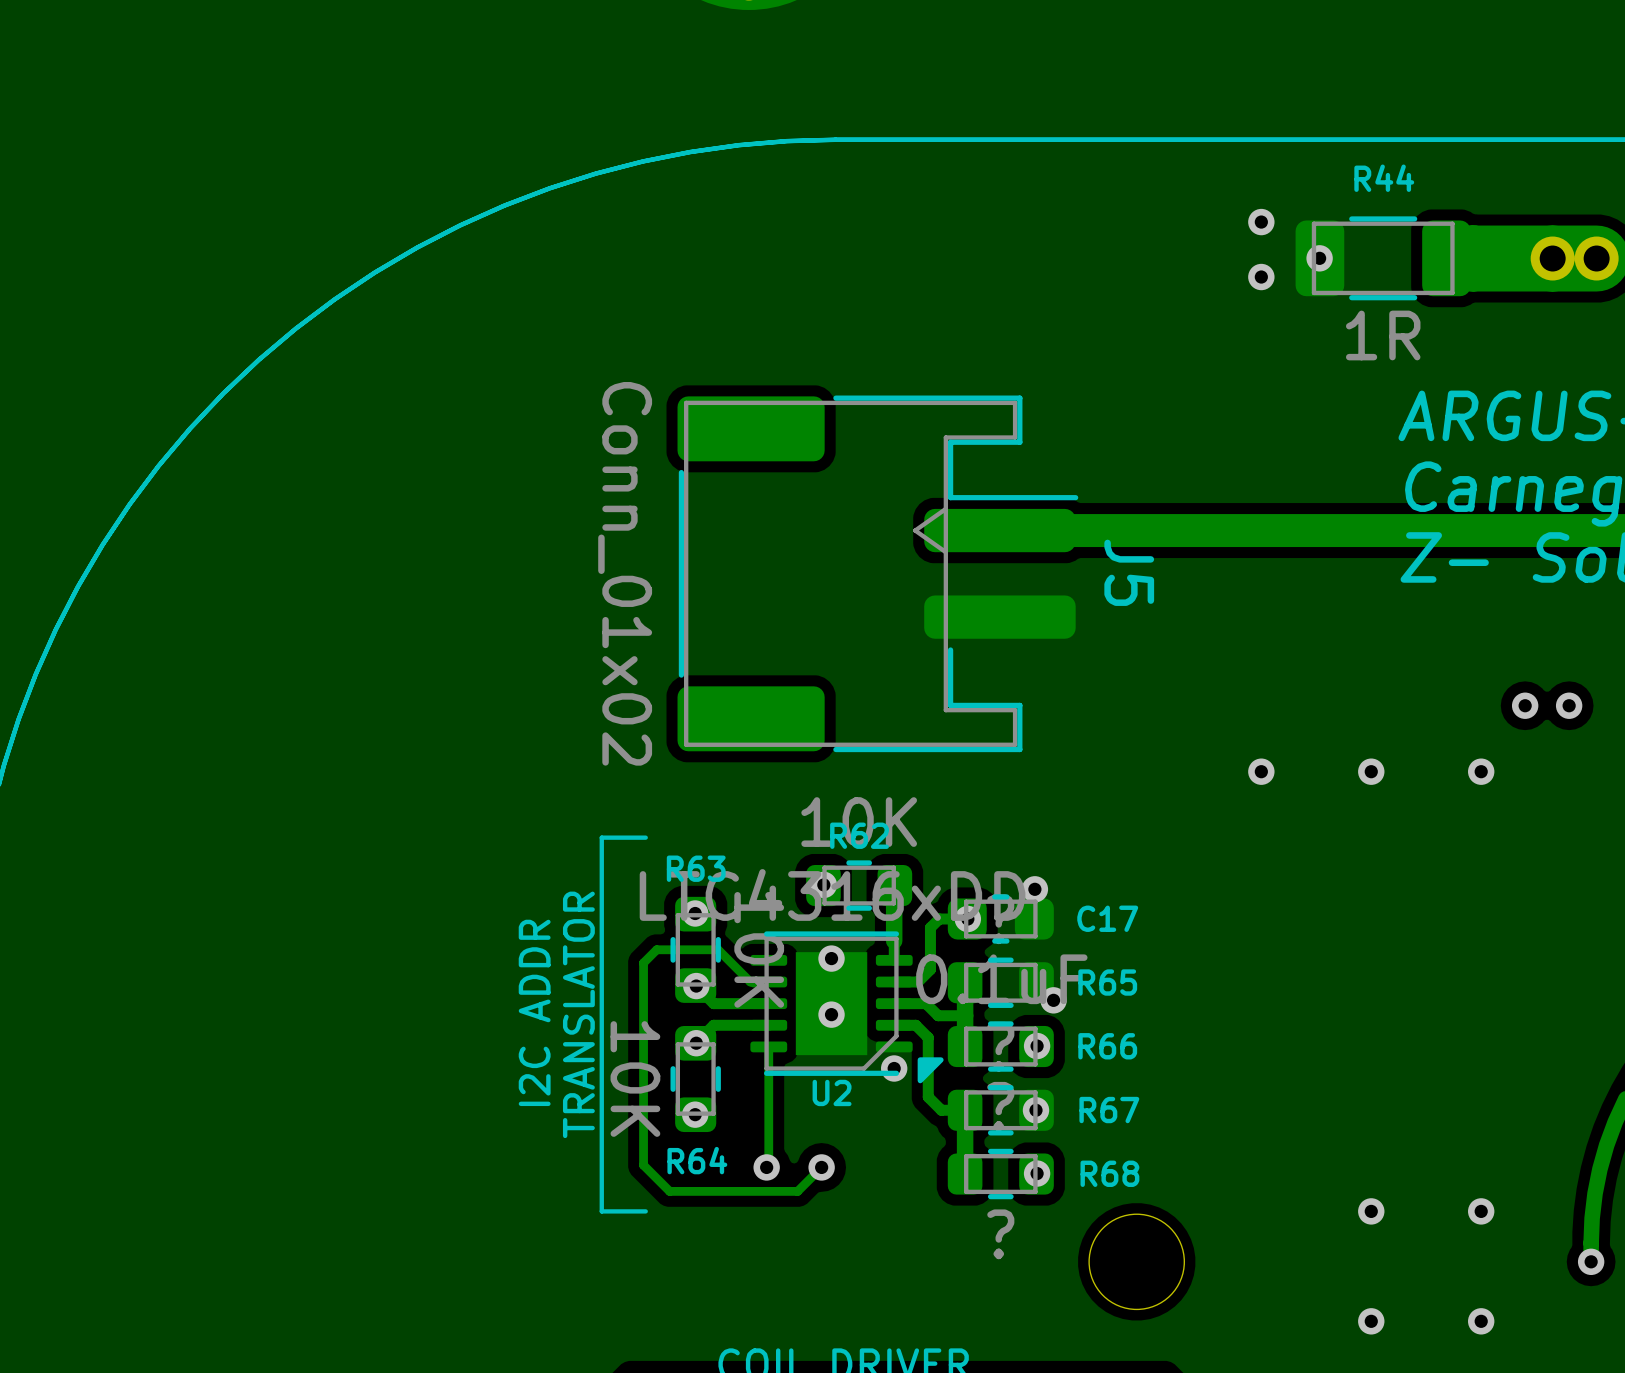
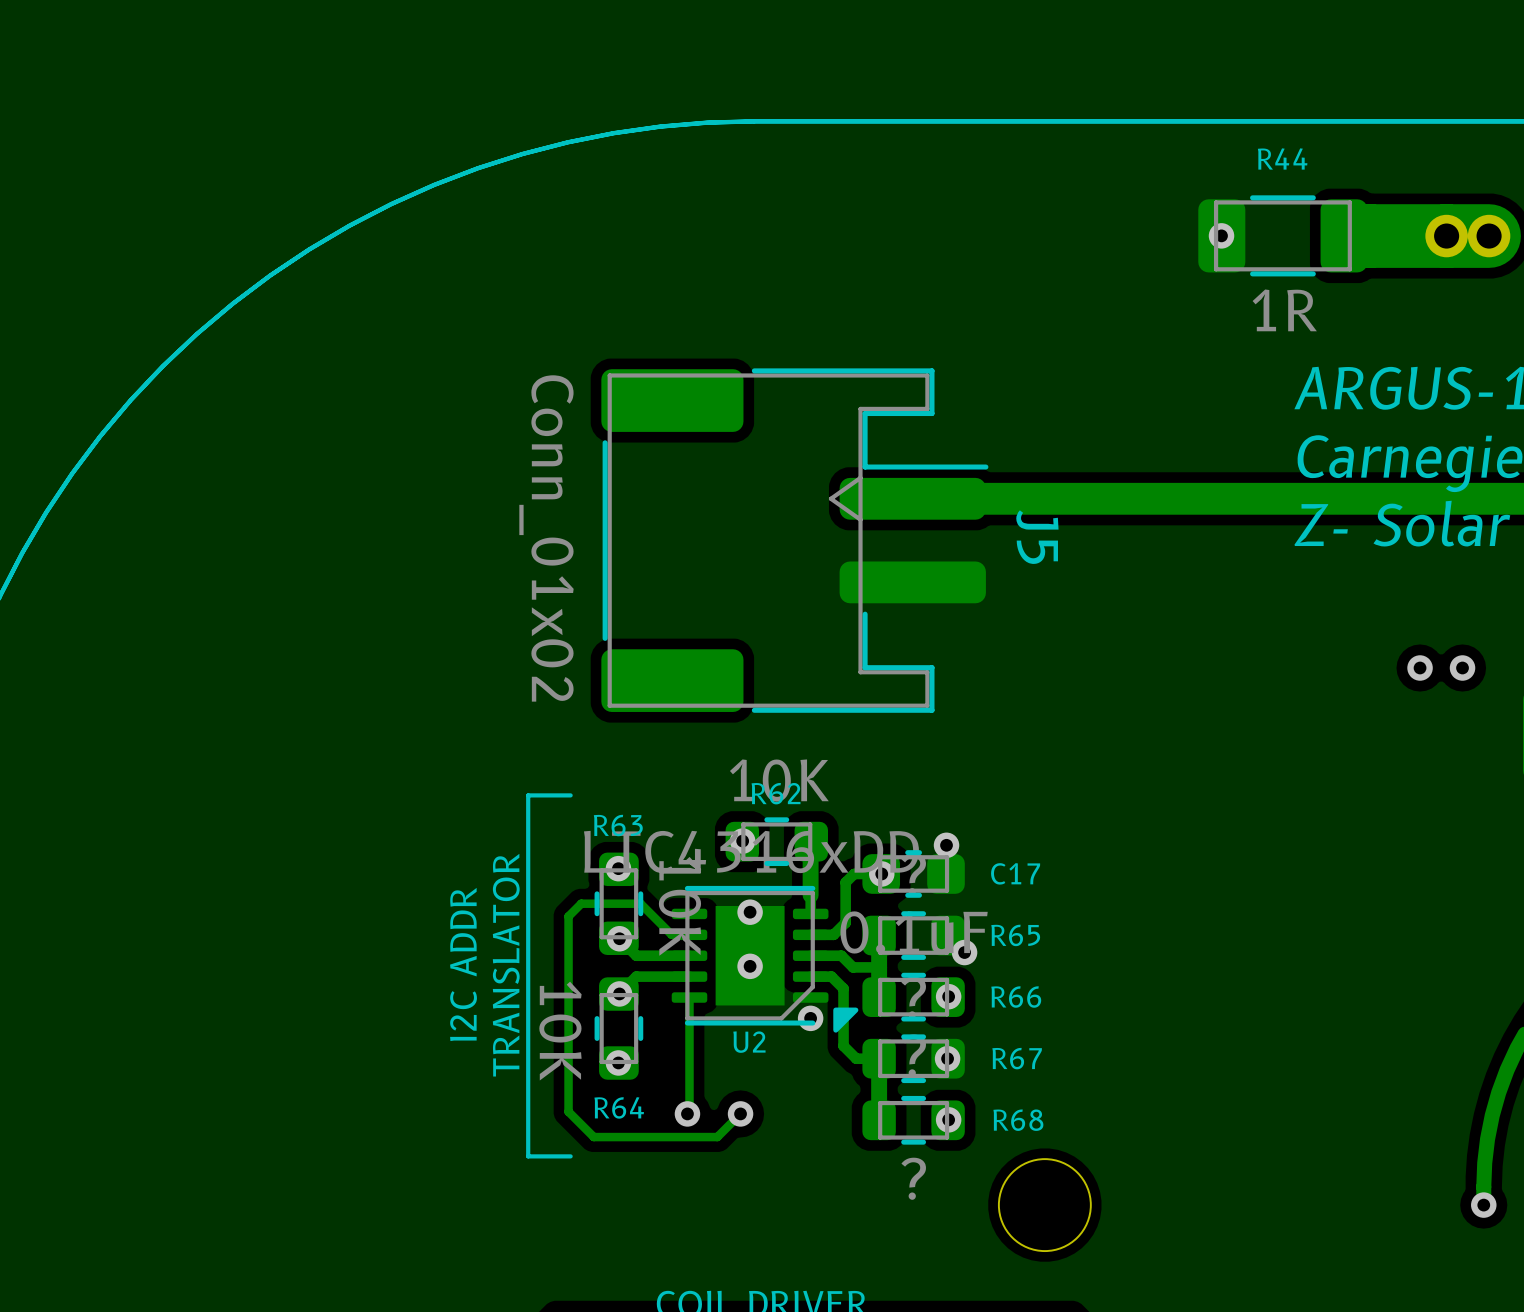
via: (1261, 222) -> none
via: (1261, 277) -> none
via: (1261, 771) -> none
via: (1371, 771) -> none
via: (1481, 771) -> none
via: (1371, 1211) -> none
via: (1481, 1211) -> none
via: (1371, 1321) -> none
via: (1481, 1321) -> none

